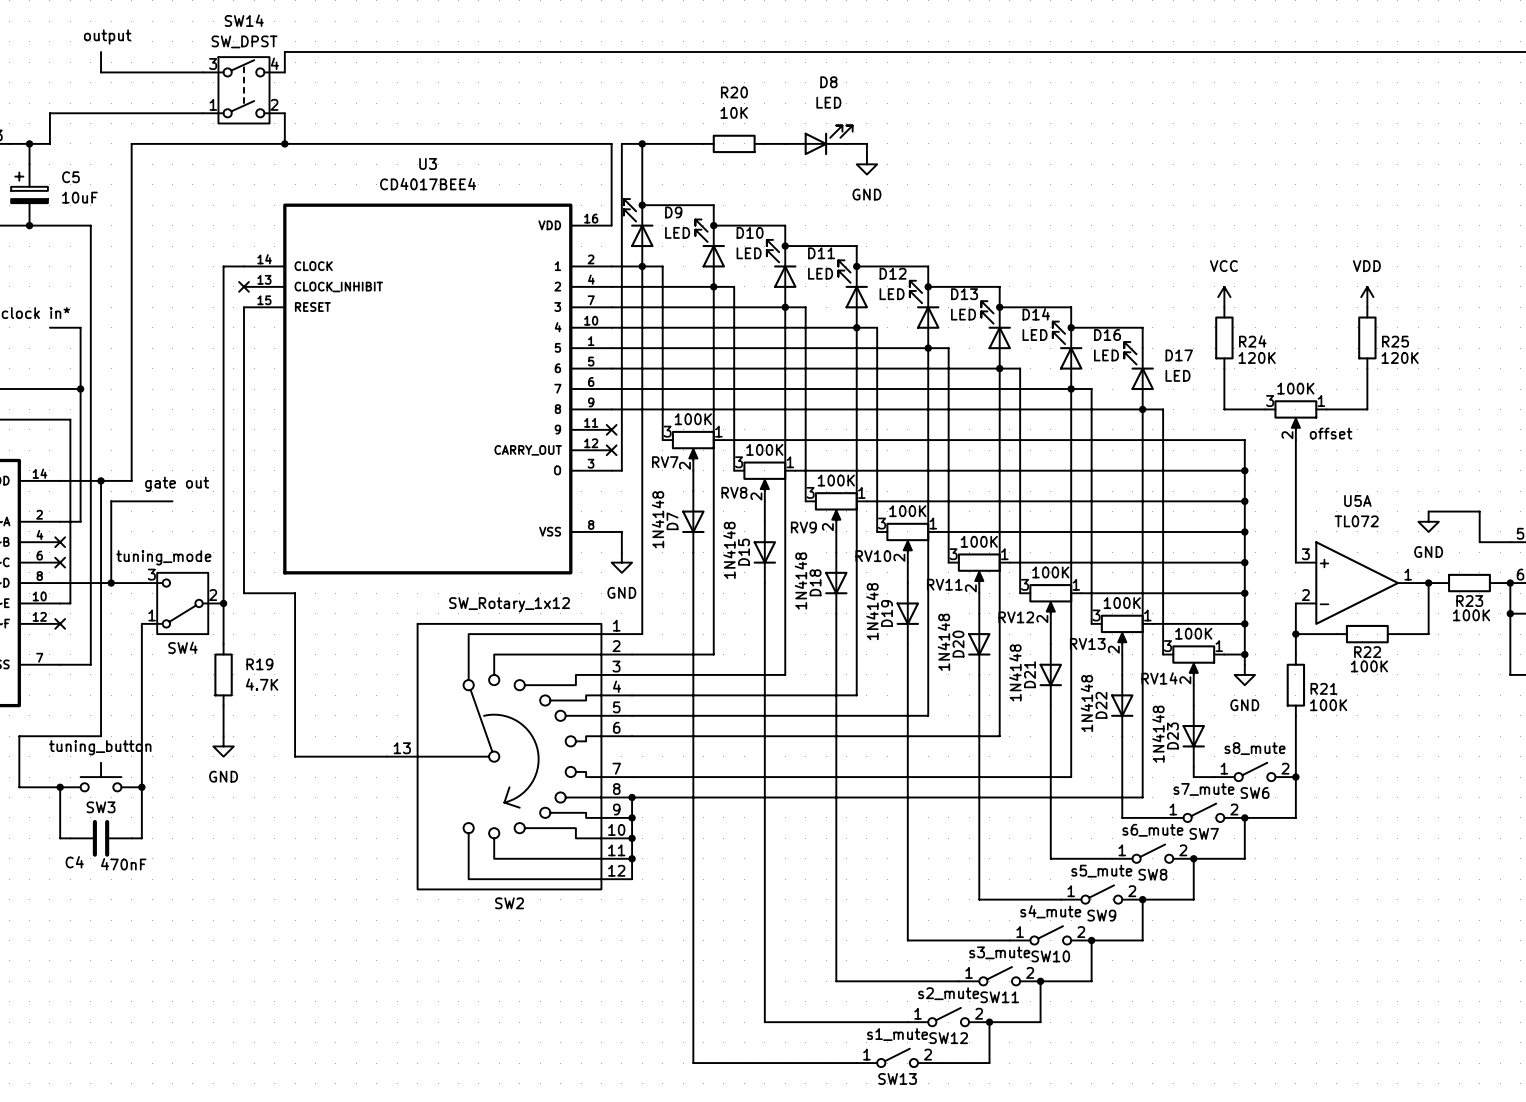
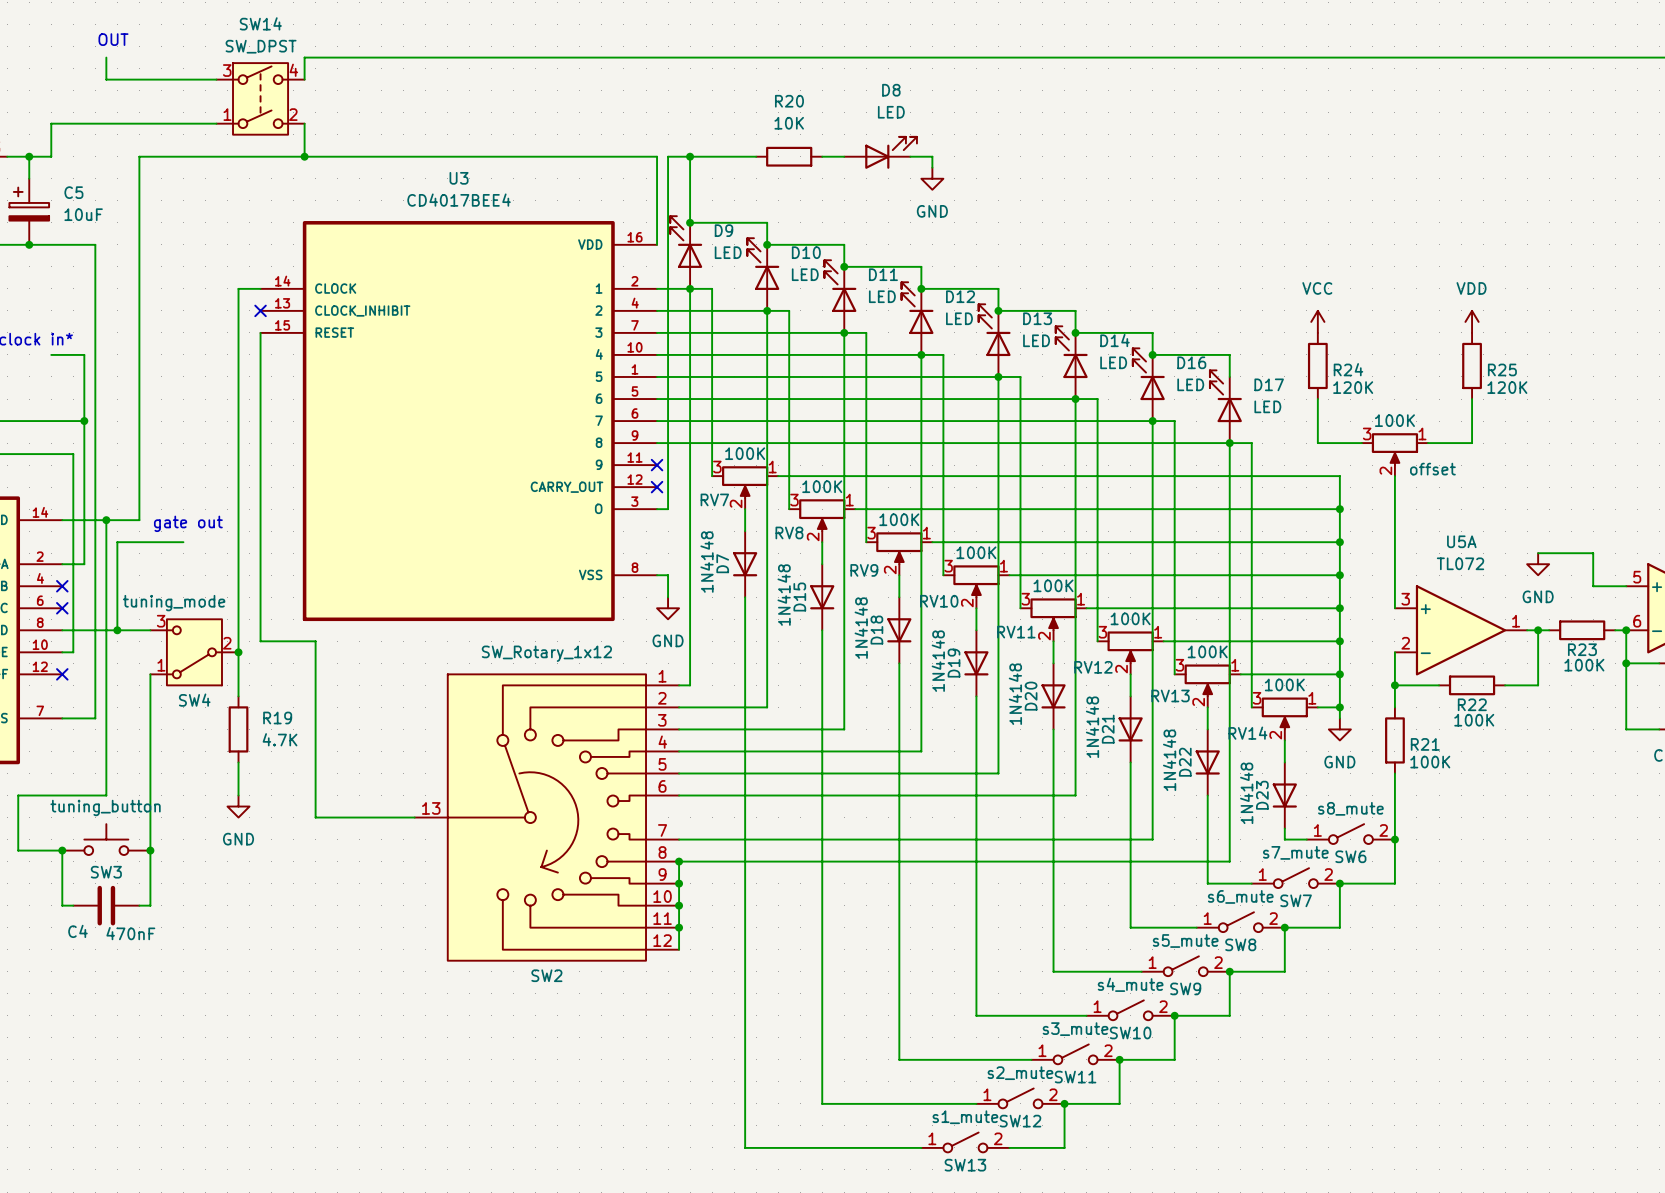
text: output (107, 37) -> OUT (113, 39)

